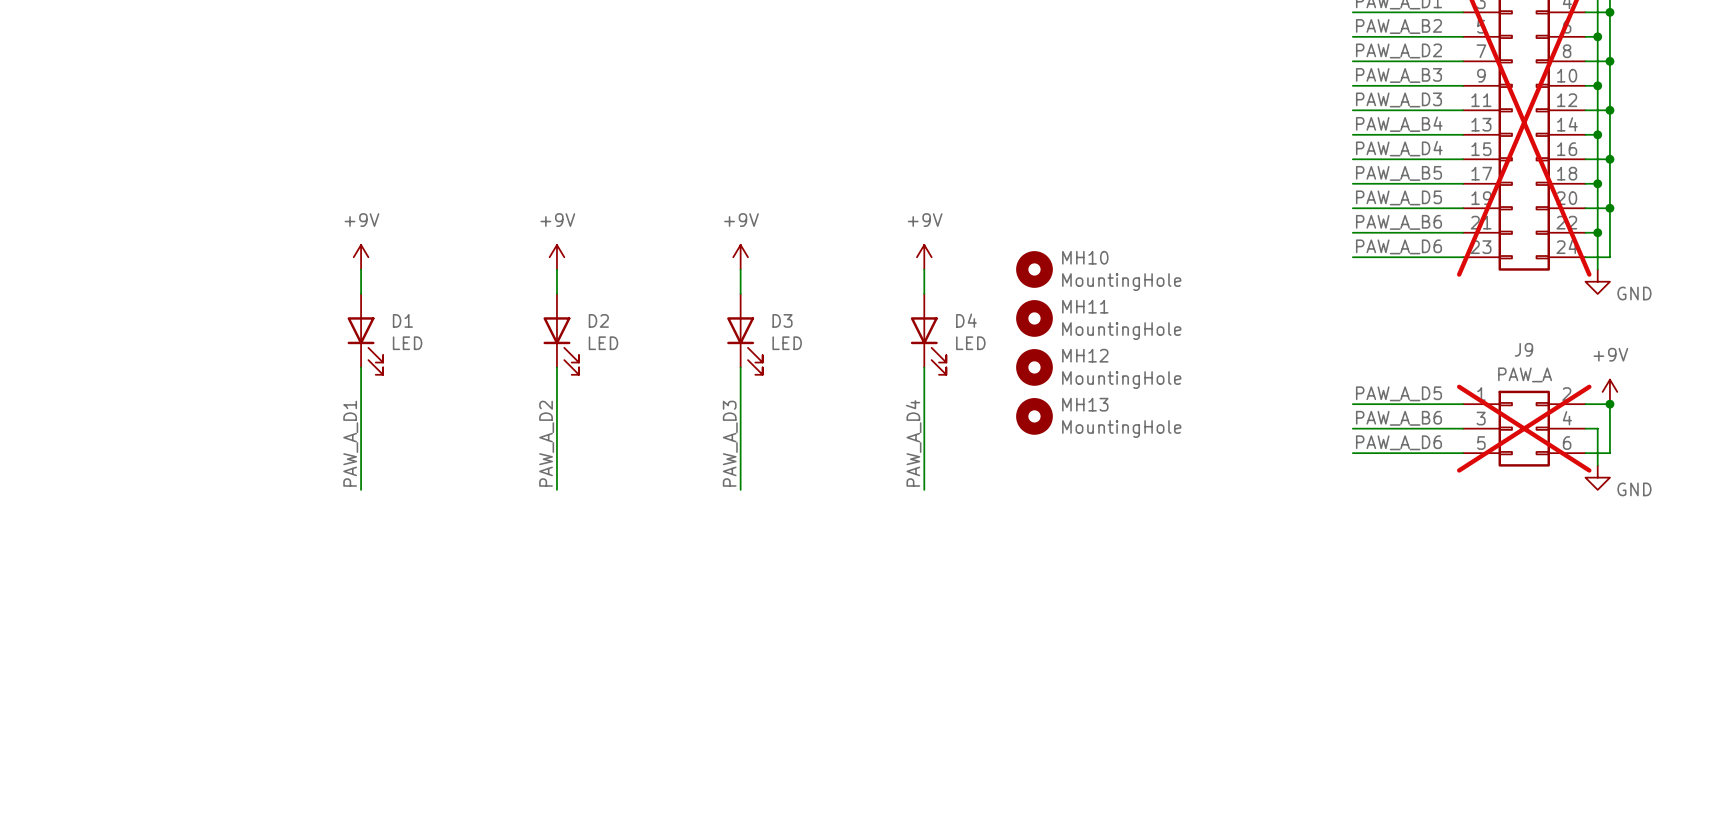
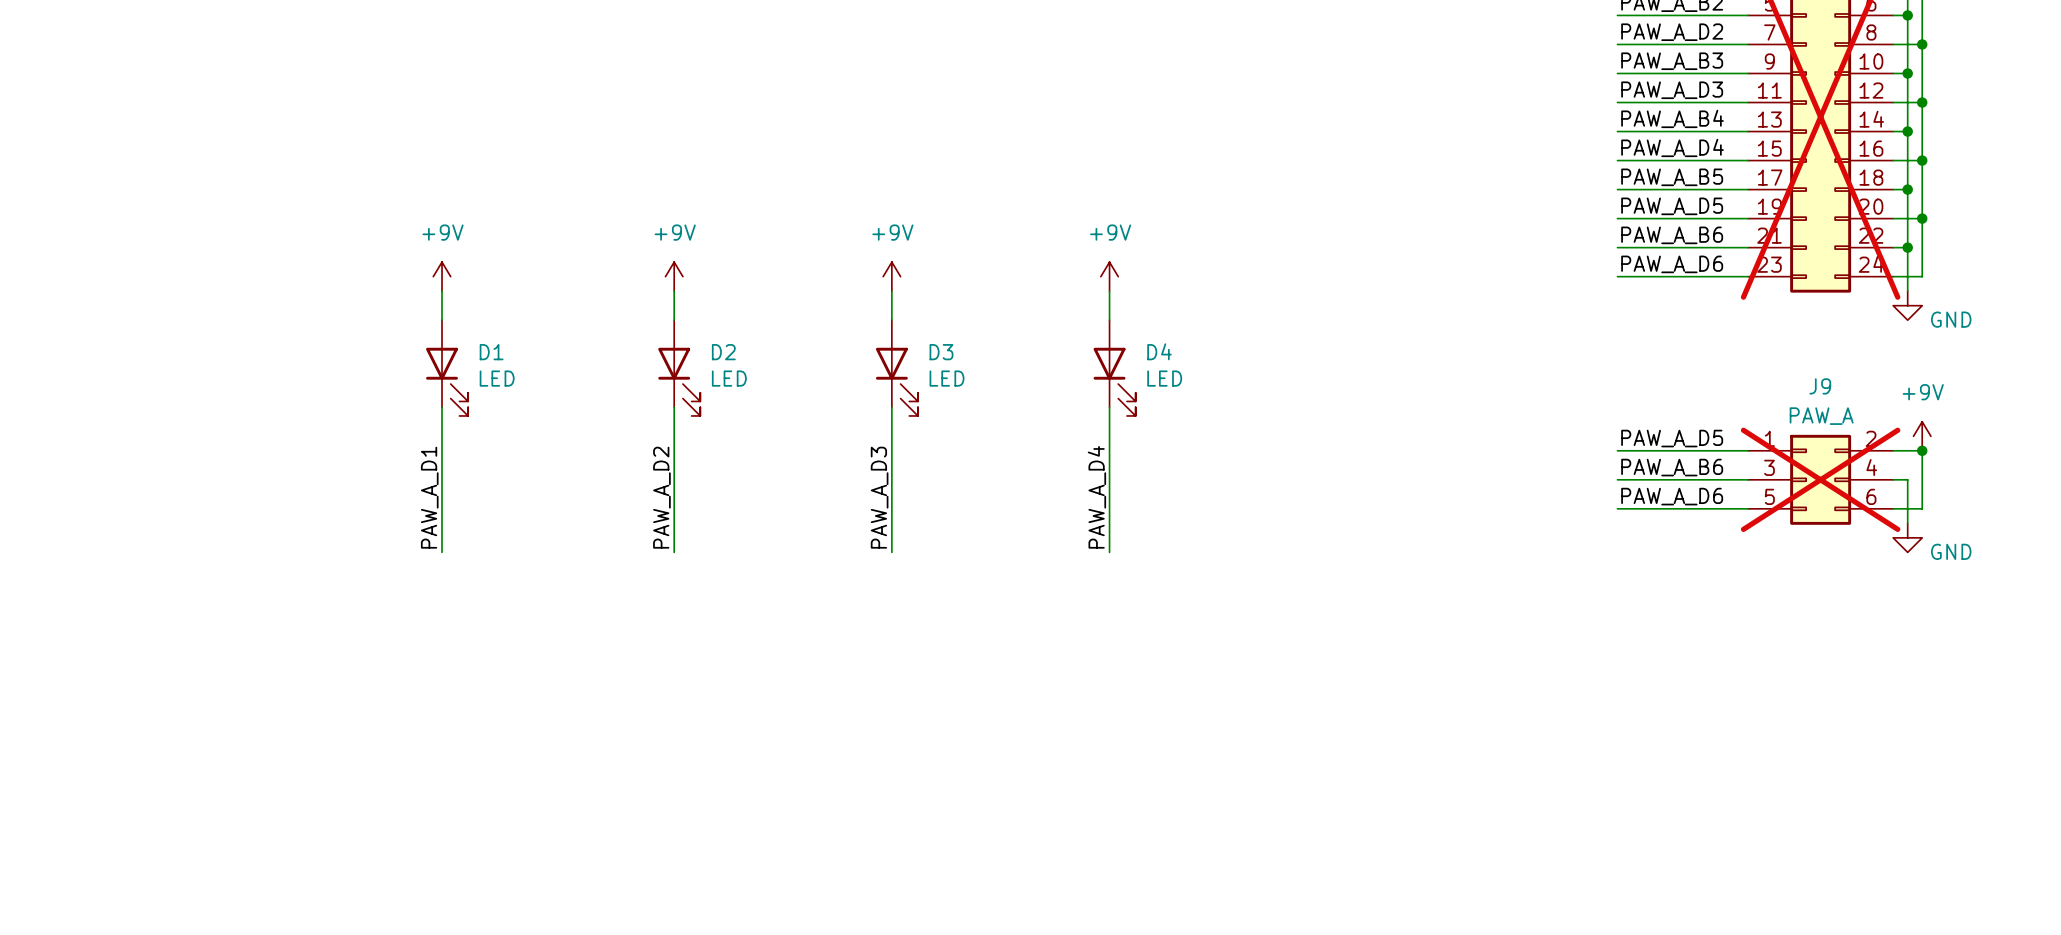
MH10: MountingHole (1034, 269) -> none
MH11: MountingHole (1034, 318) -> none
MH12: MountingHole (1034, 367) -> none
MH13: MountingHole (1034, 416) -> none

